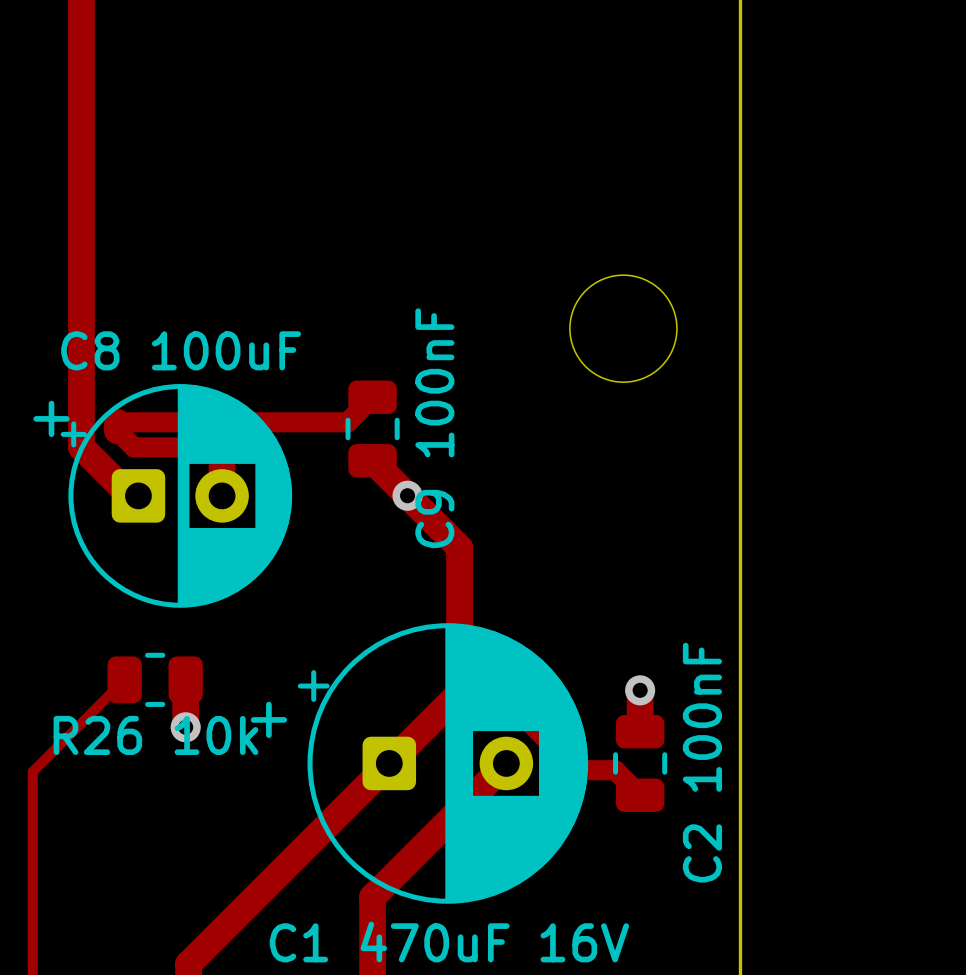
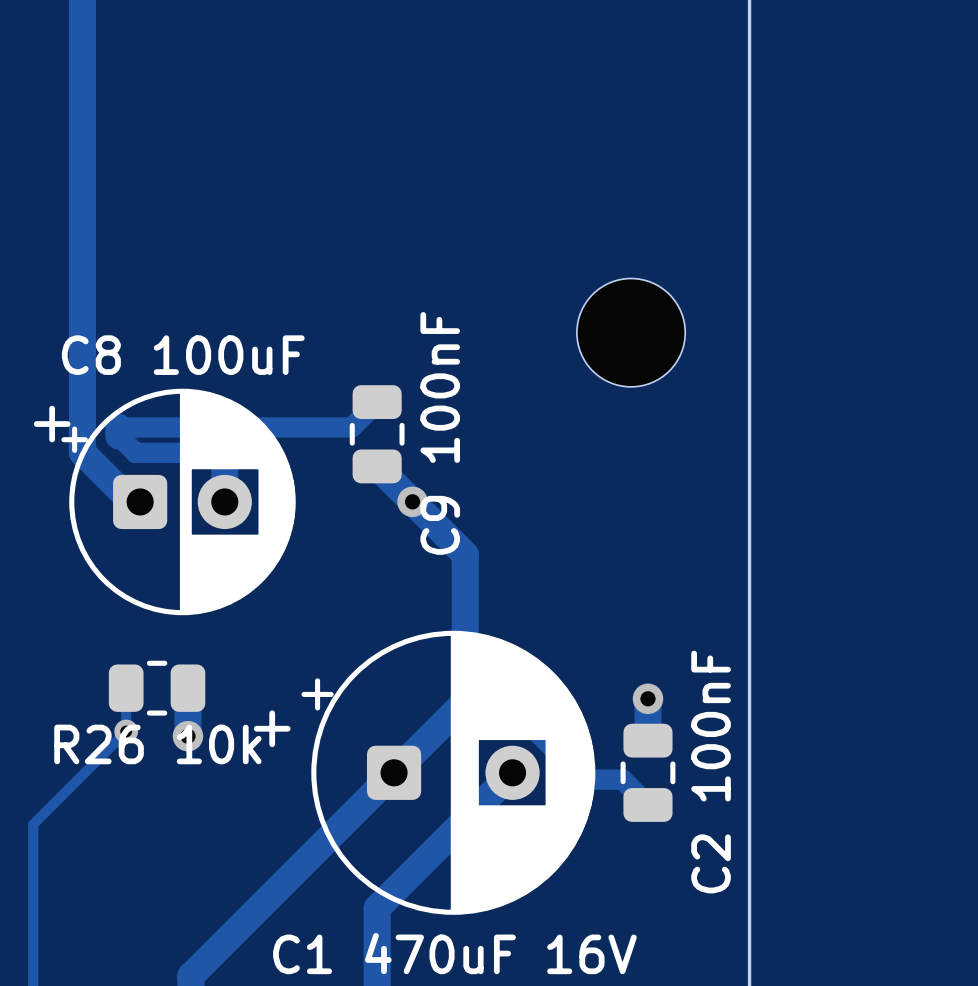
track: (124, 679) (32, 771) (32, 814) -> (126, 688) (126, 731) (33, 824)
via: none -> (126, 731)

